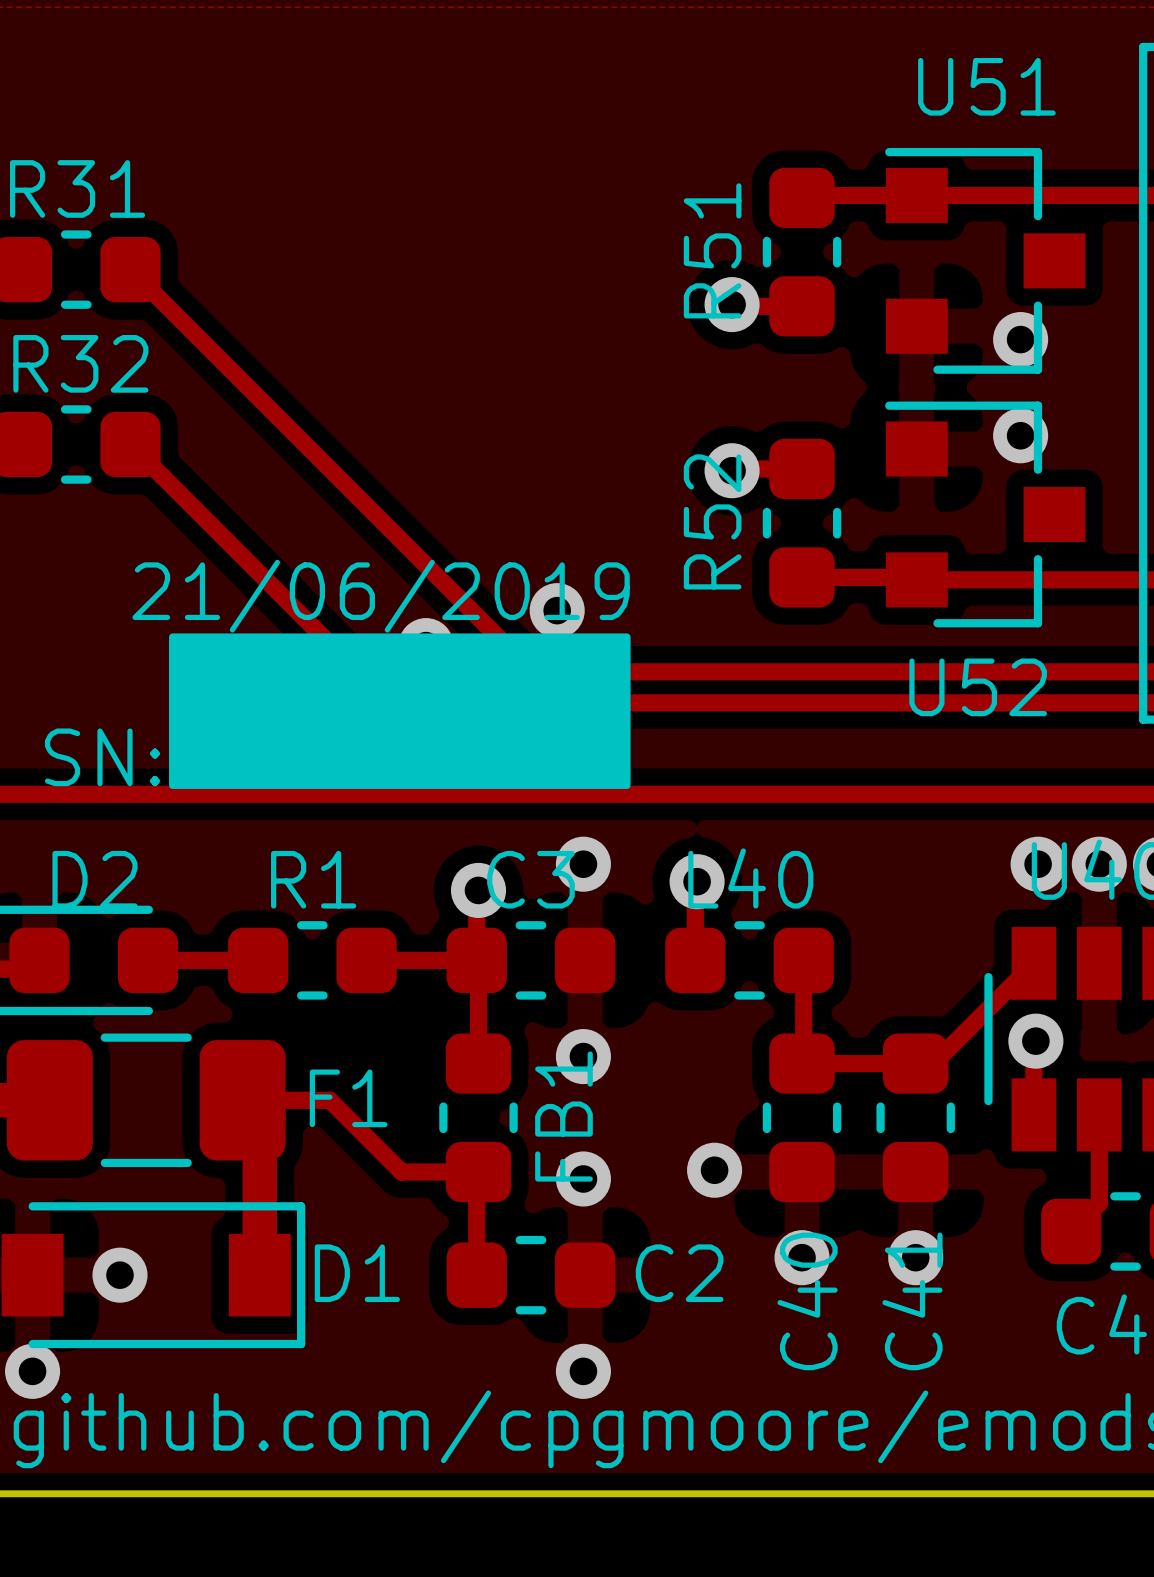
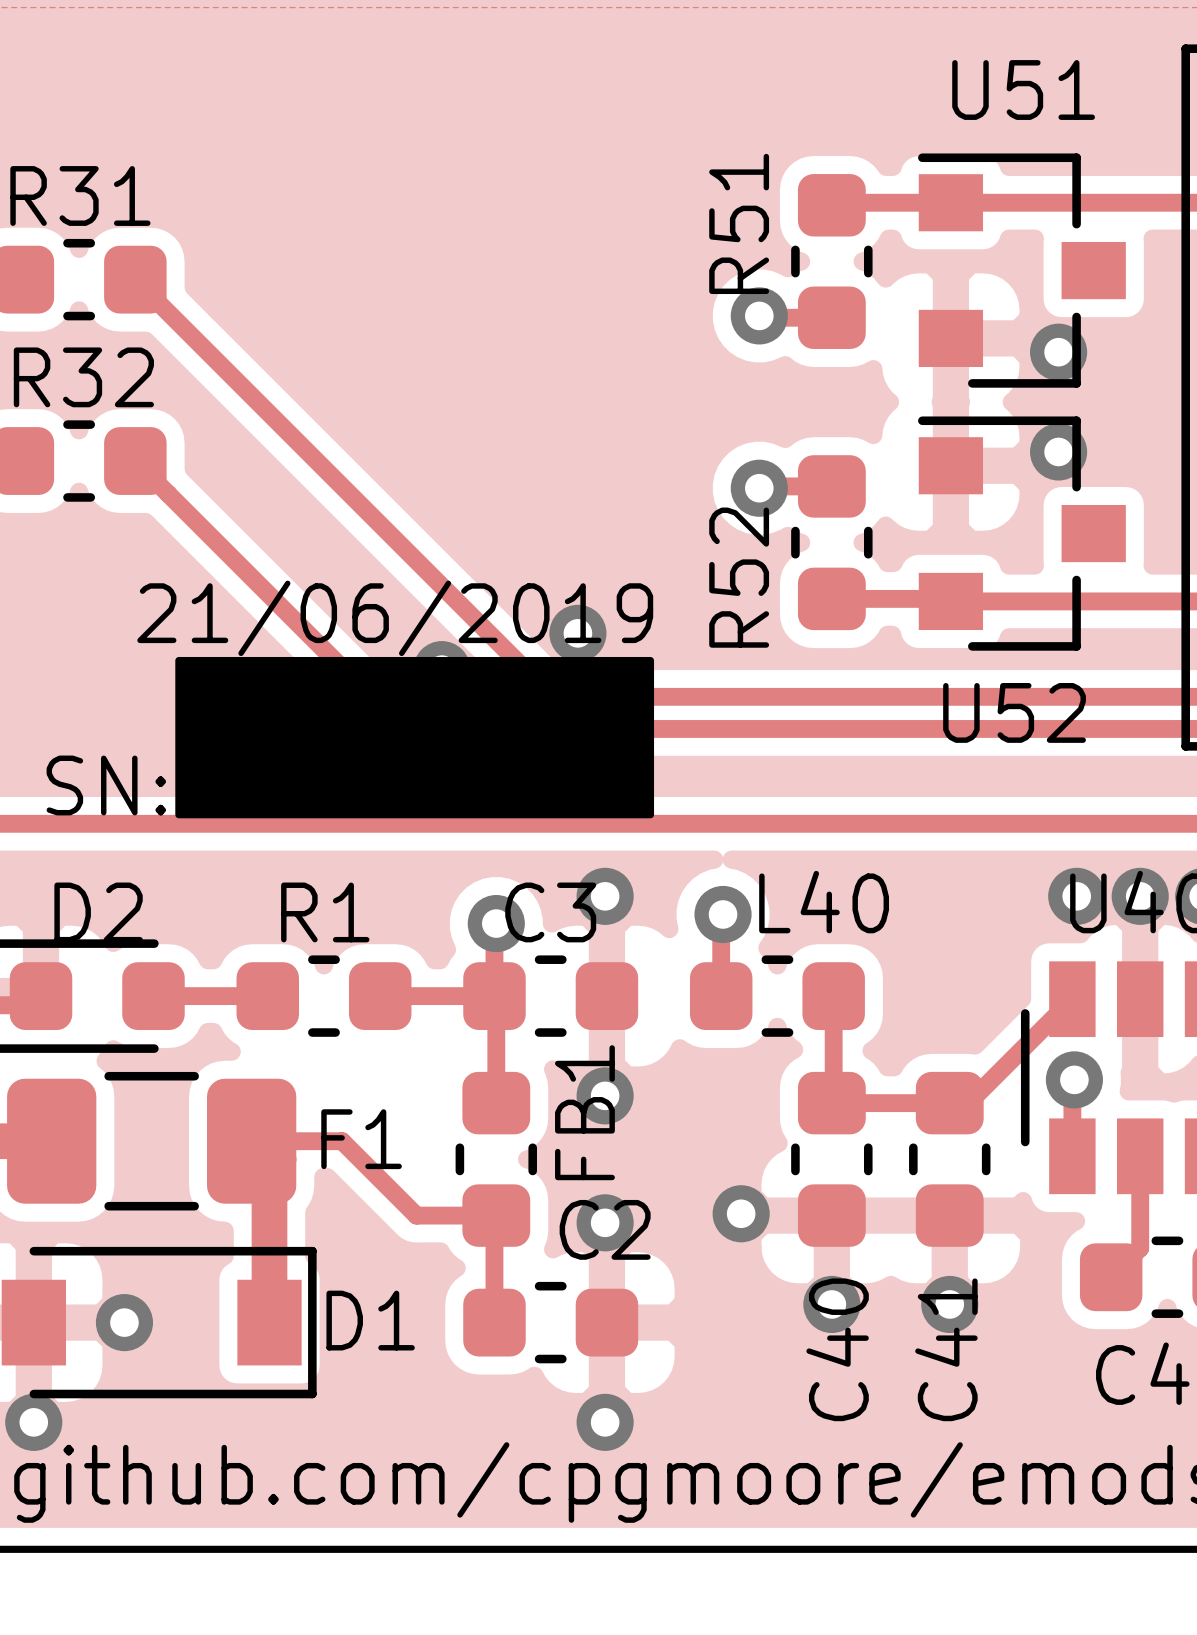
R51 name position: R51 (712, 250) -> R51 (739, 223)
R52 name position: R52 (712, 521) -> R52 (739, 577)
L40 name position: L40 (750, 878) -> L40 (824, 902)
FB1 name position: FB1 (563, 1116) -> FB1 (584, 1112)
C2 name position: C2 (679, 1273) -> C2 (605, 1229)

